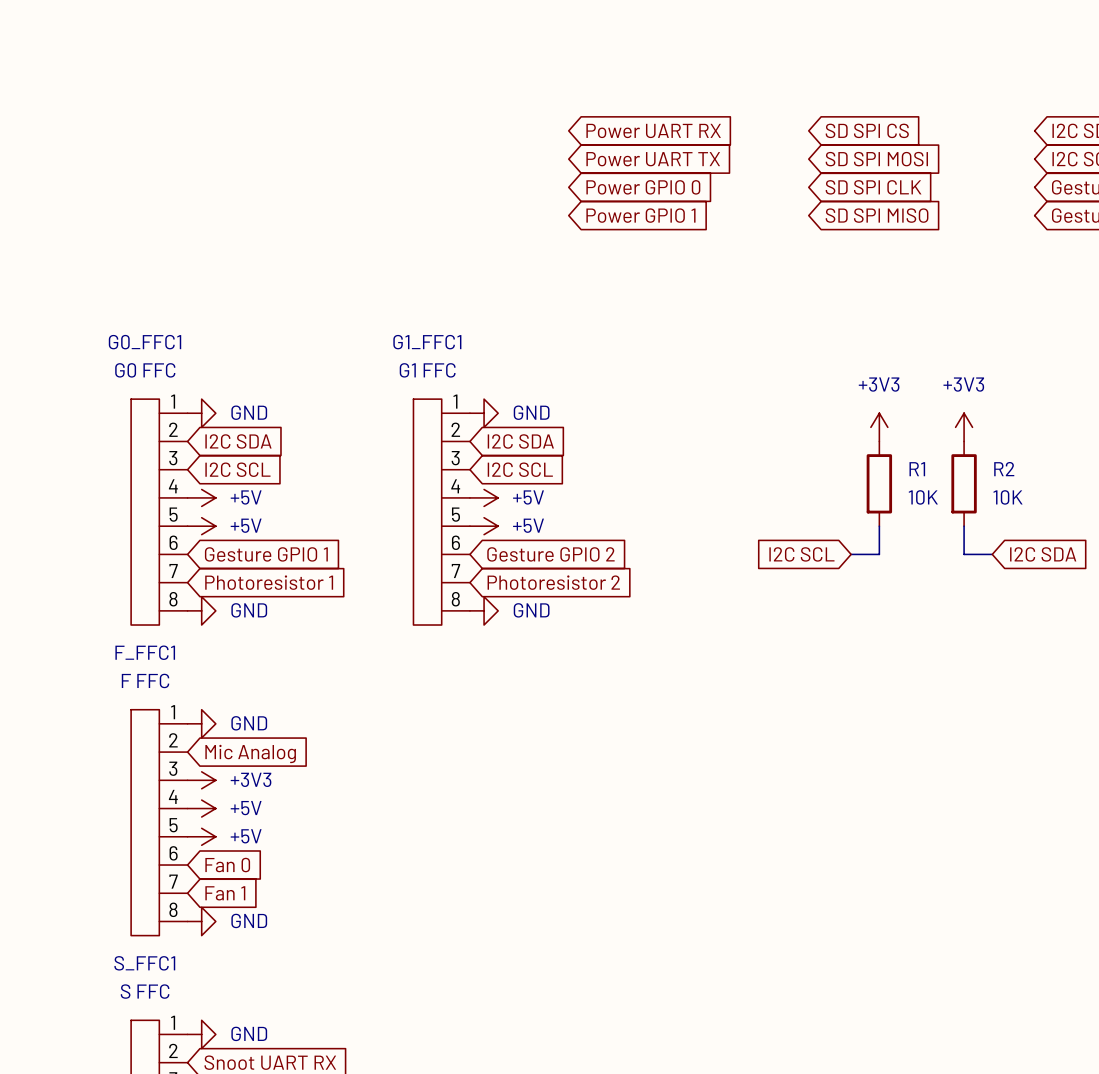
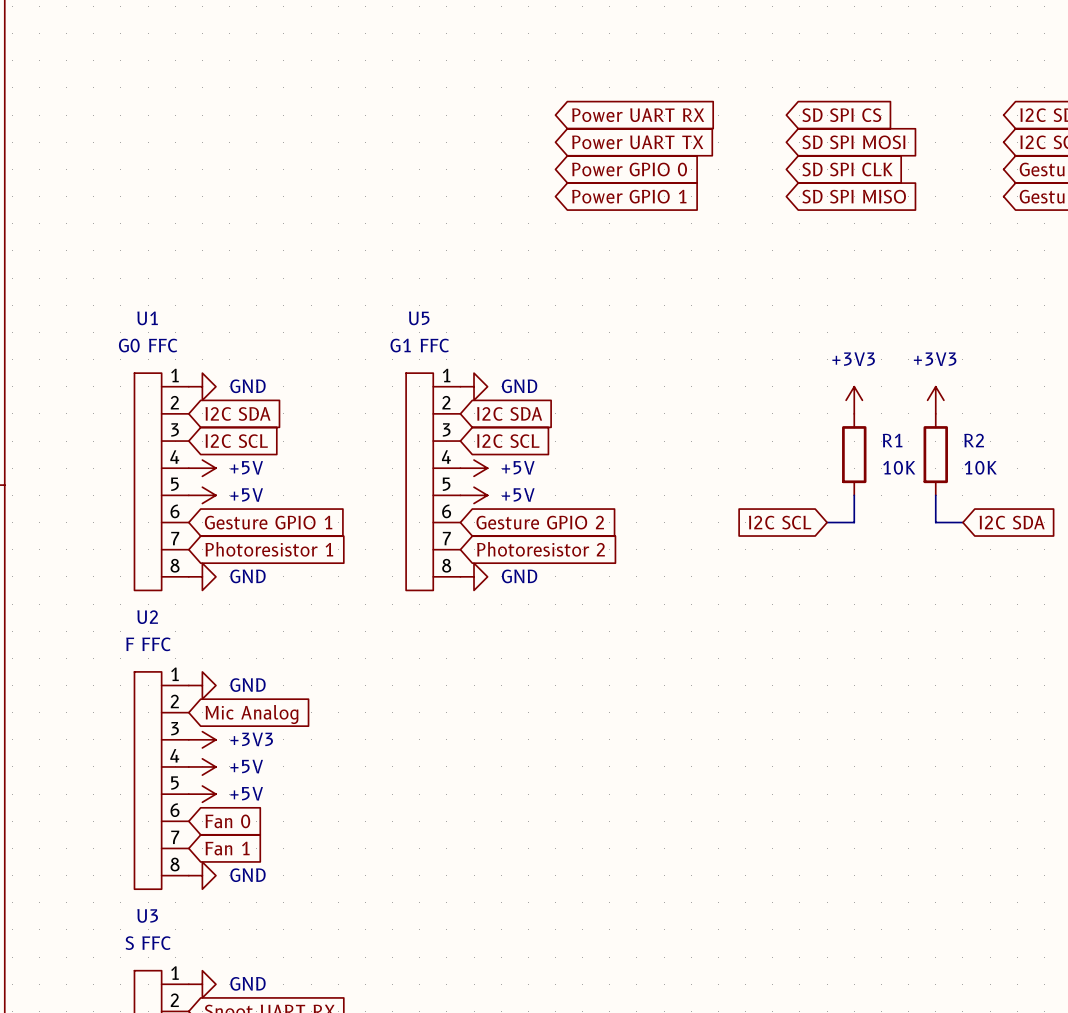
G0_FFC1 name: G0_FFC1 (145, 342) -> U1 (147, 318)
G1_FFC1 name: G1_FFC1 (427, 342) -> U5 (419, 318)
F_FFC1 name: F_FFC1 (145, 652) -> U2 (147, 617)
S_FFC1 name: S_FFC1 (144, 963) -> U3 (147, 915)

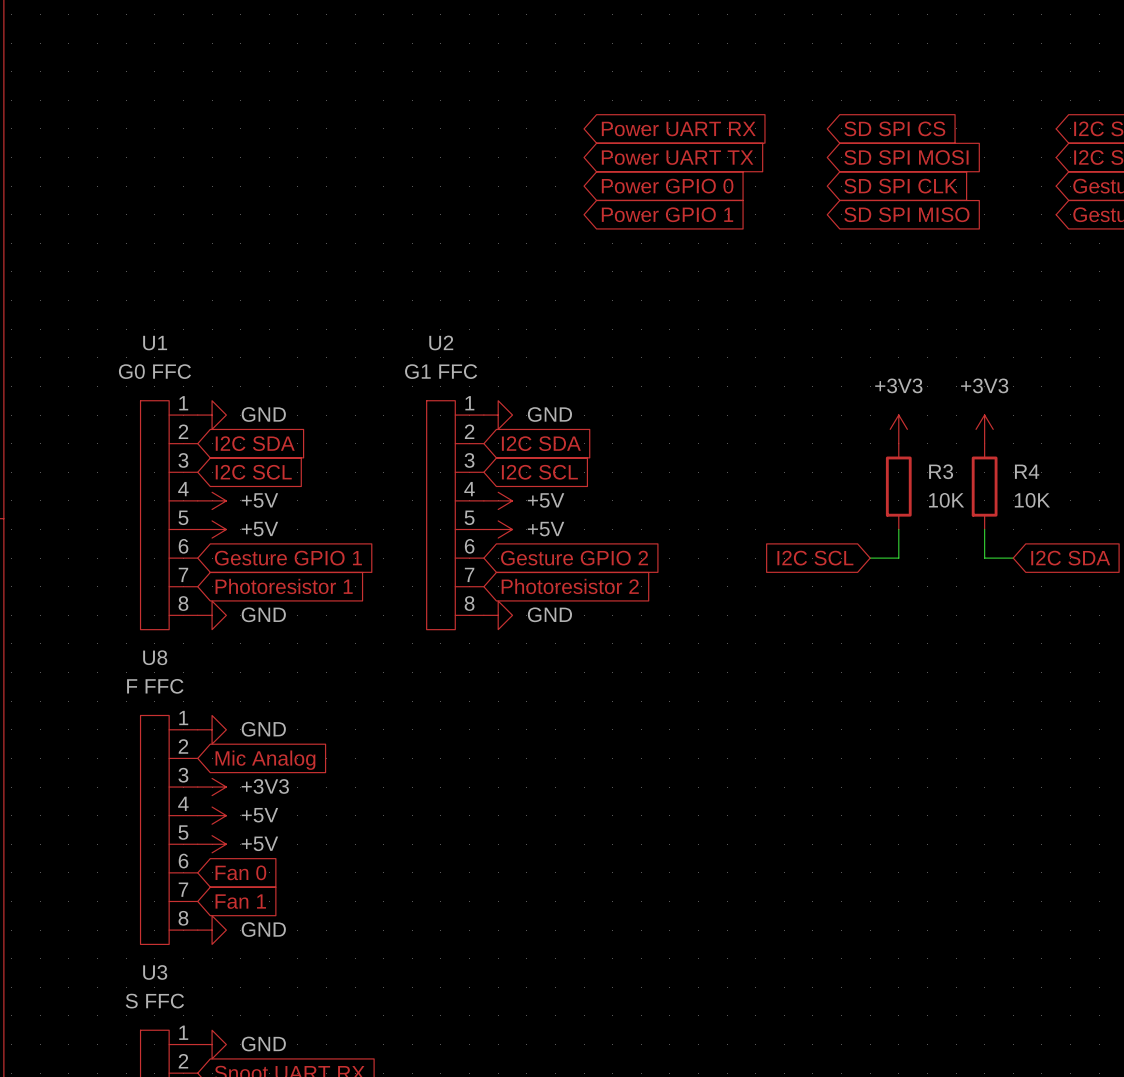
U5 name: U5 (419, 318) -> U2 (441, 342)
R1 name: R1 (892, 440) -> R3 (941, 471)
R2 name: R2 (974, 440) -> R4 (1027, 471)
U2 name: U2 (147, 617) -> U8 (155, 657)

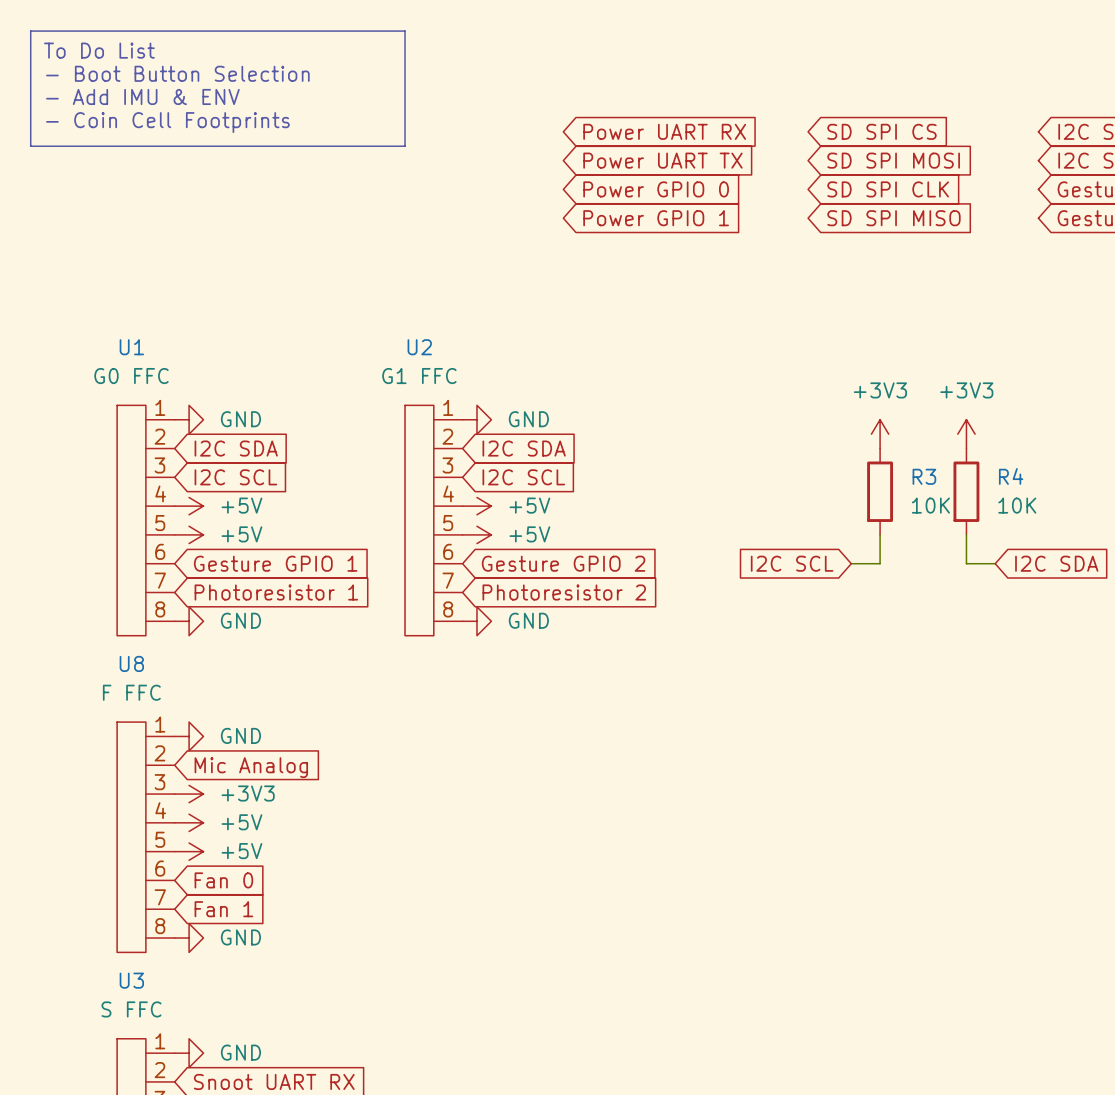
line: none -> (30, 31) (405, 31) (405, 146) (30, 146) (30, 31)
text: none -> To Do List (99, 50)
text: none -> - Boot Button Selection (177, 73)
text: none -> - Add IMU & ENV (142, 96)
text: none -> - Coin Cell Footprints (167, 122)

